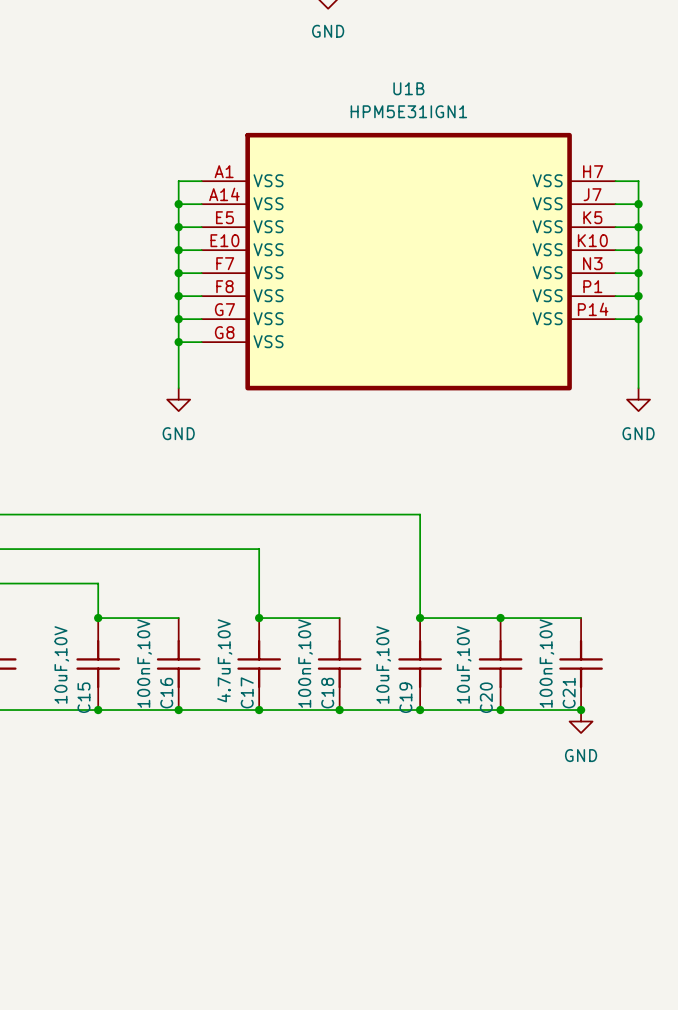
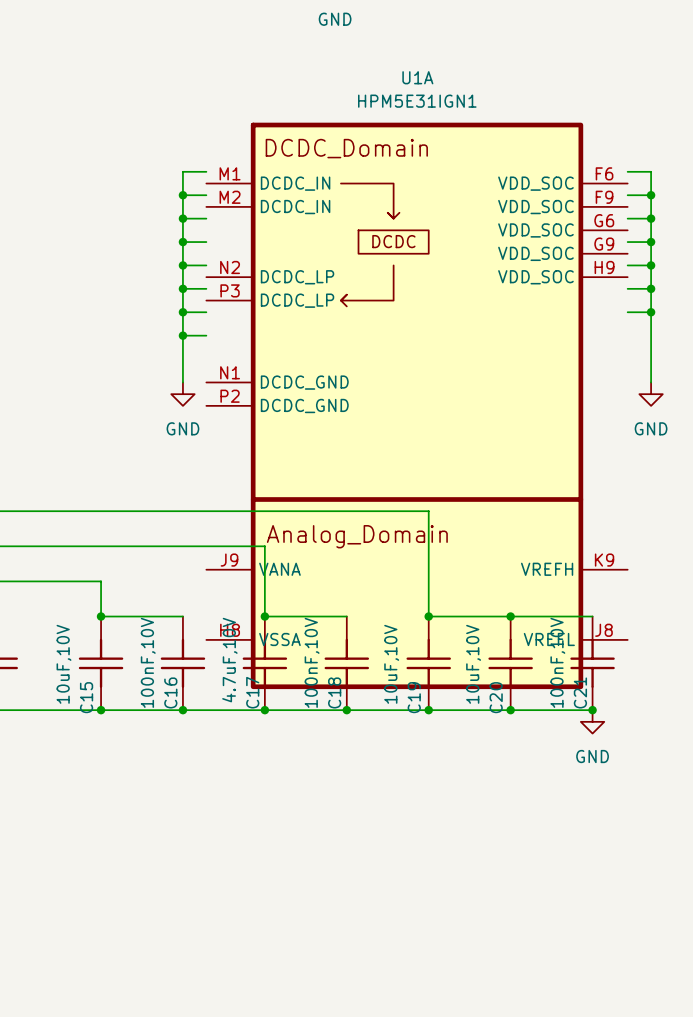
U1B: HPM5E31IGN1 (408, 261) -> none
U1A: none -> HPM5E31IGN1 (417, 405)

